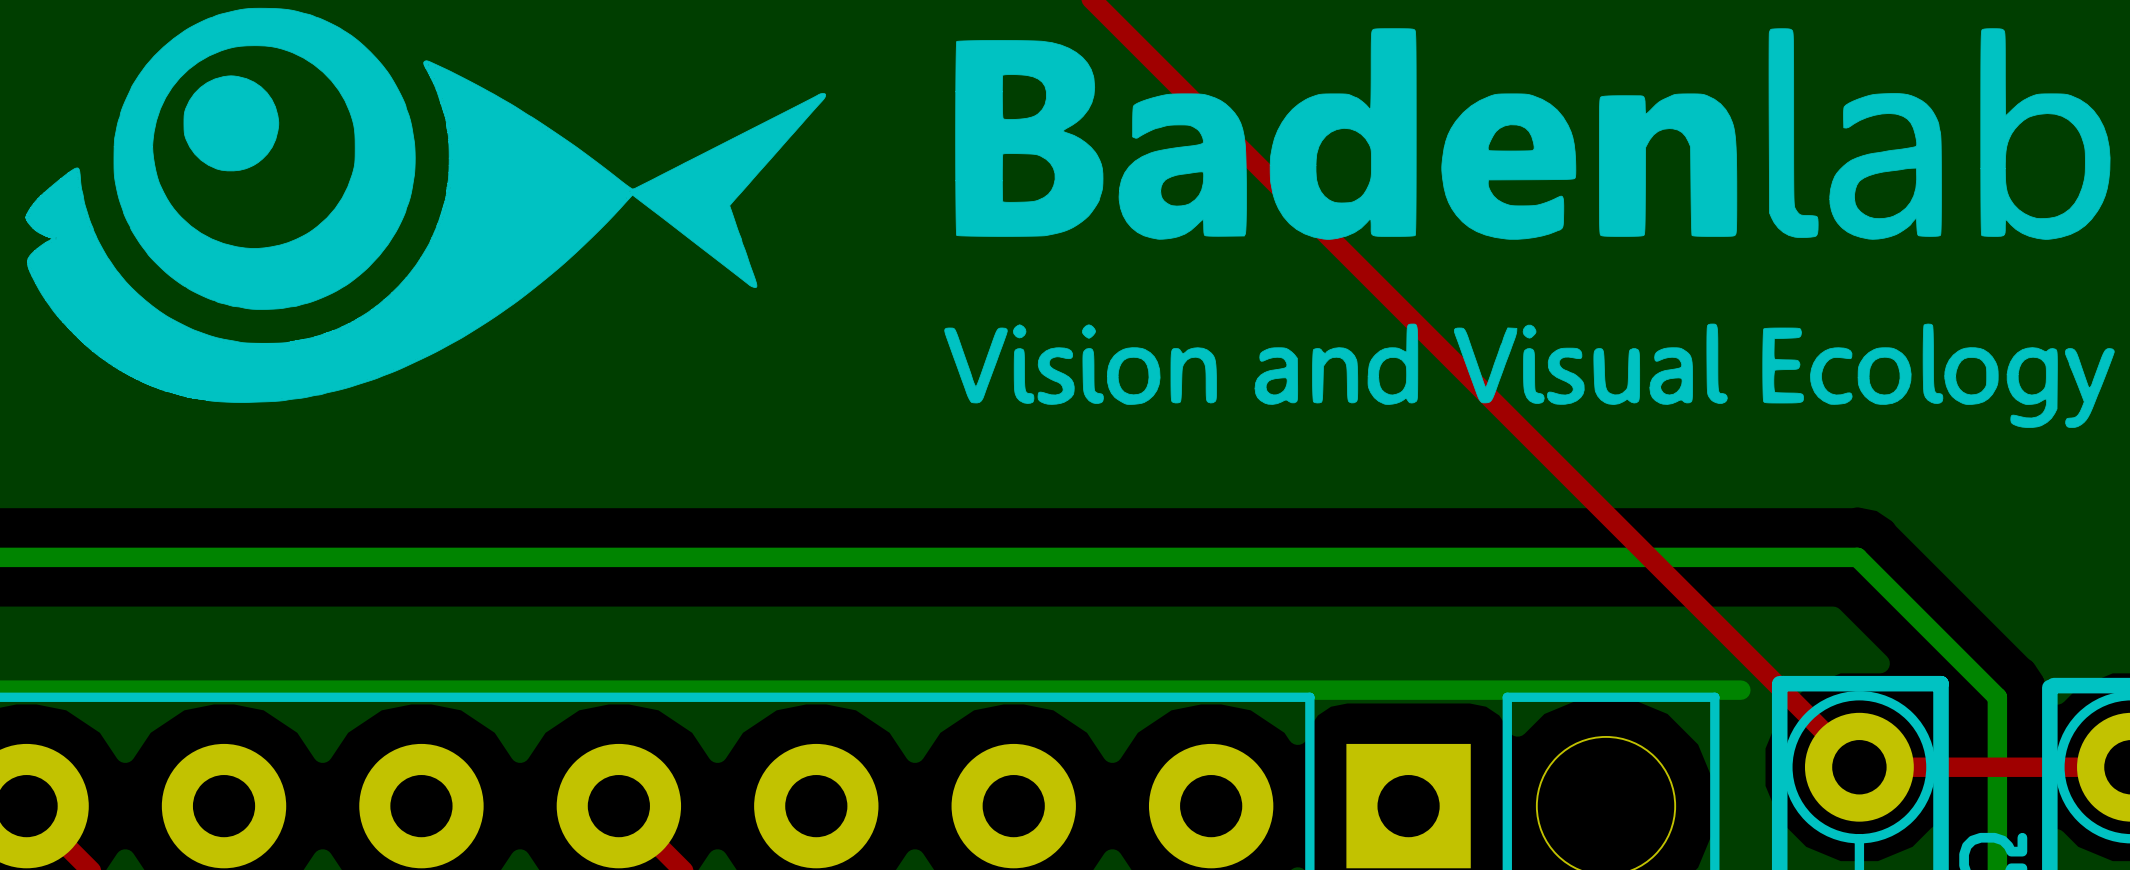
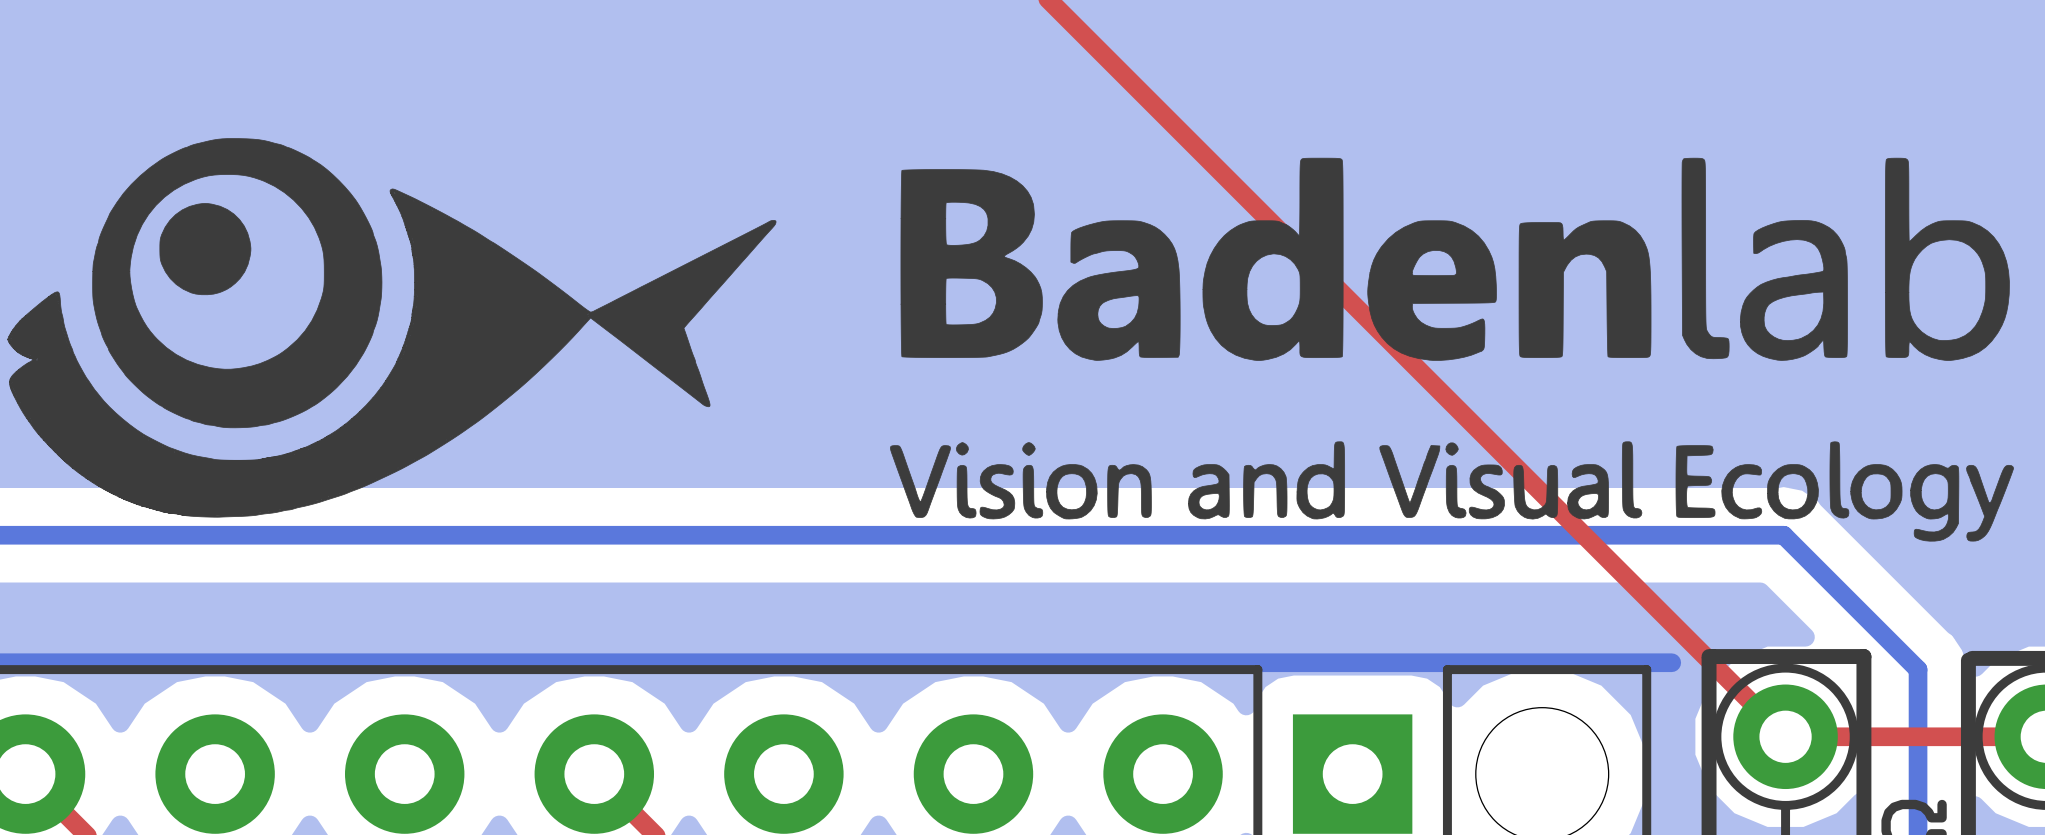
drawing position: (1069, 217) -> (1010, 339)

